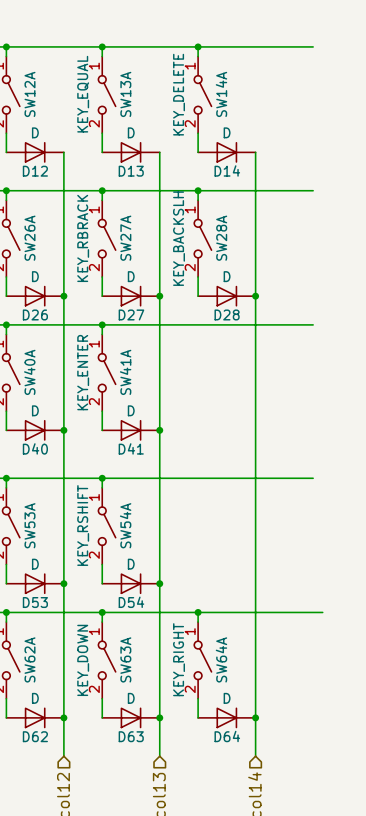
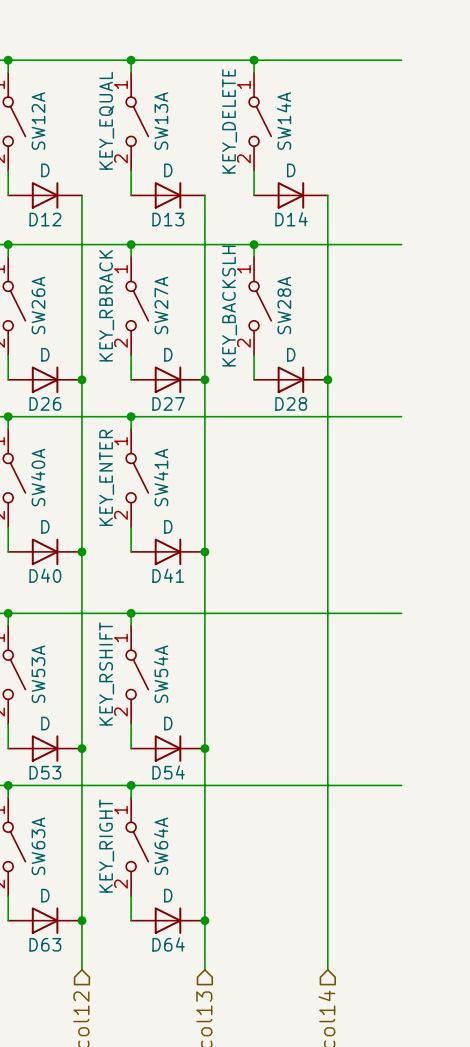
wire: (198, 612) (198, 622) -> none
junction: (198, 612) -> none
wire: (313, 612) (322, 612) -> none
SW62A name: SW62A (30, 659) -> SW63A (38, 846)
SW63A name: SW63A (125, 659) -> SW64A (161, 846)
SW63A value: KEY_DOWN (83, 660) -> KEY_RIGHT (106, 846)
SW64A: KEY_RIGHT (202, 660) -> none
wire: (198, 698) (198, 717) -> none
D64: D (226, 717) -> none
junction: (255, 717) -> none
D62 name: D62 (35, 736) -> D63 (45, 944)
D63 name: D63 (131, 736) -> D64 (168, 944)

